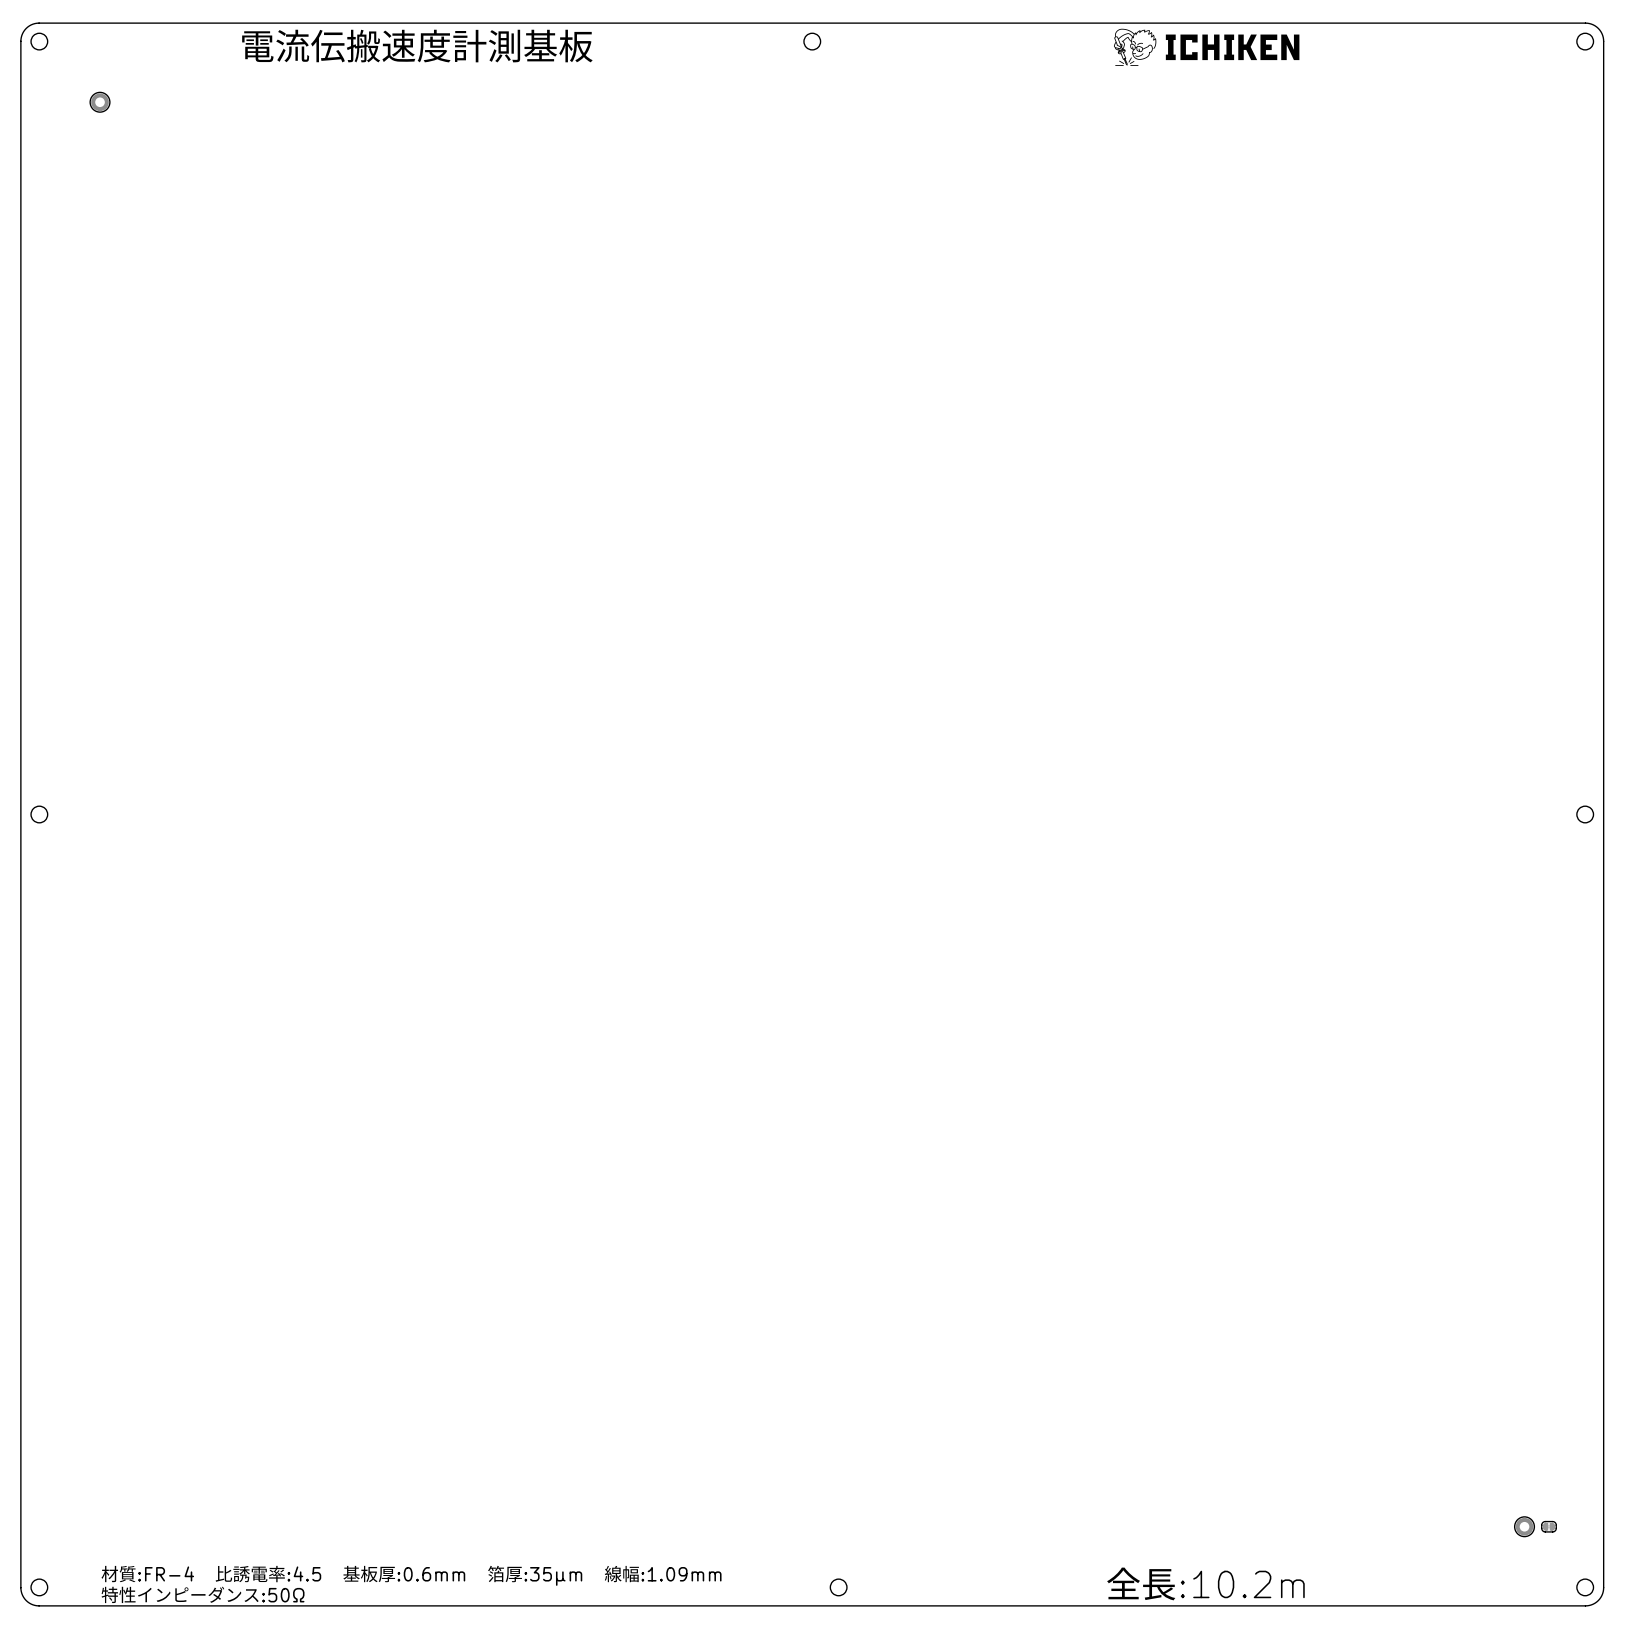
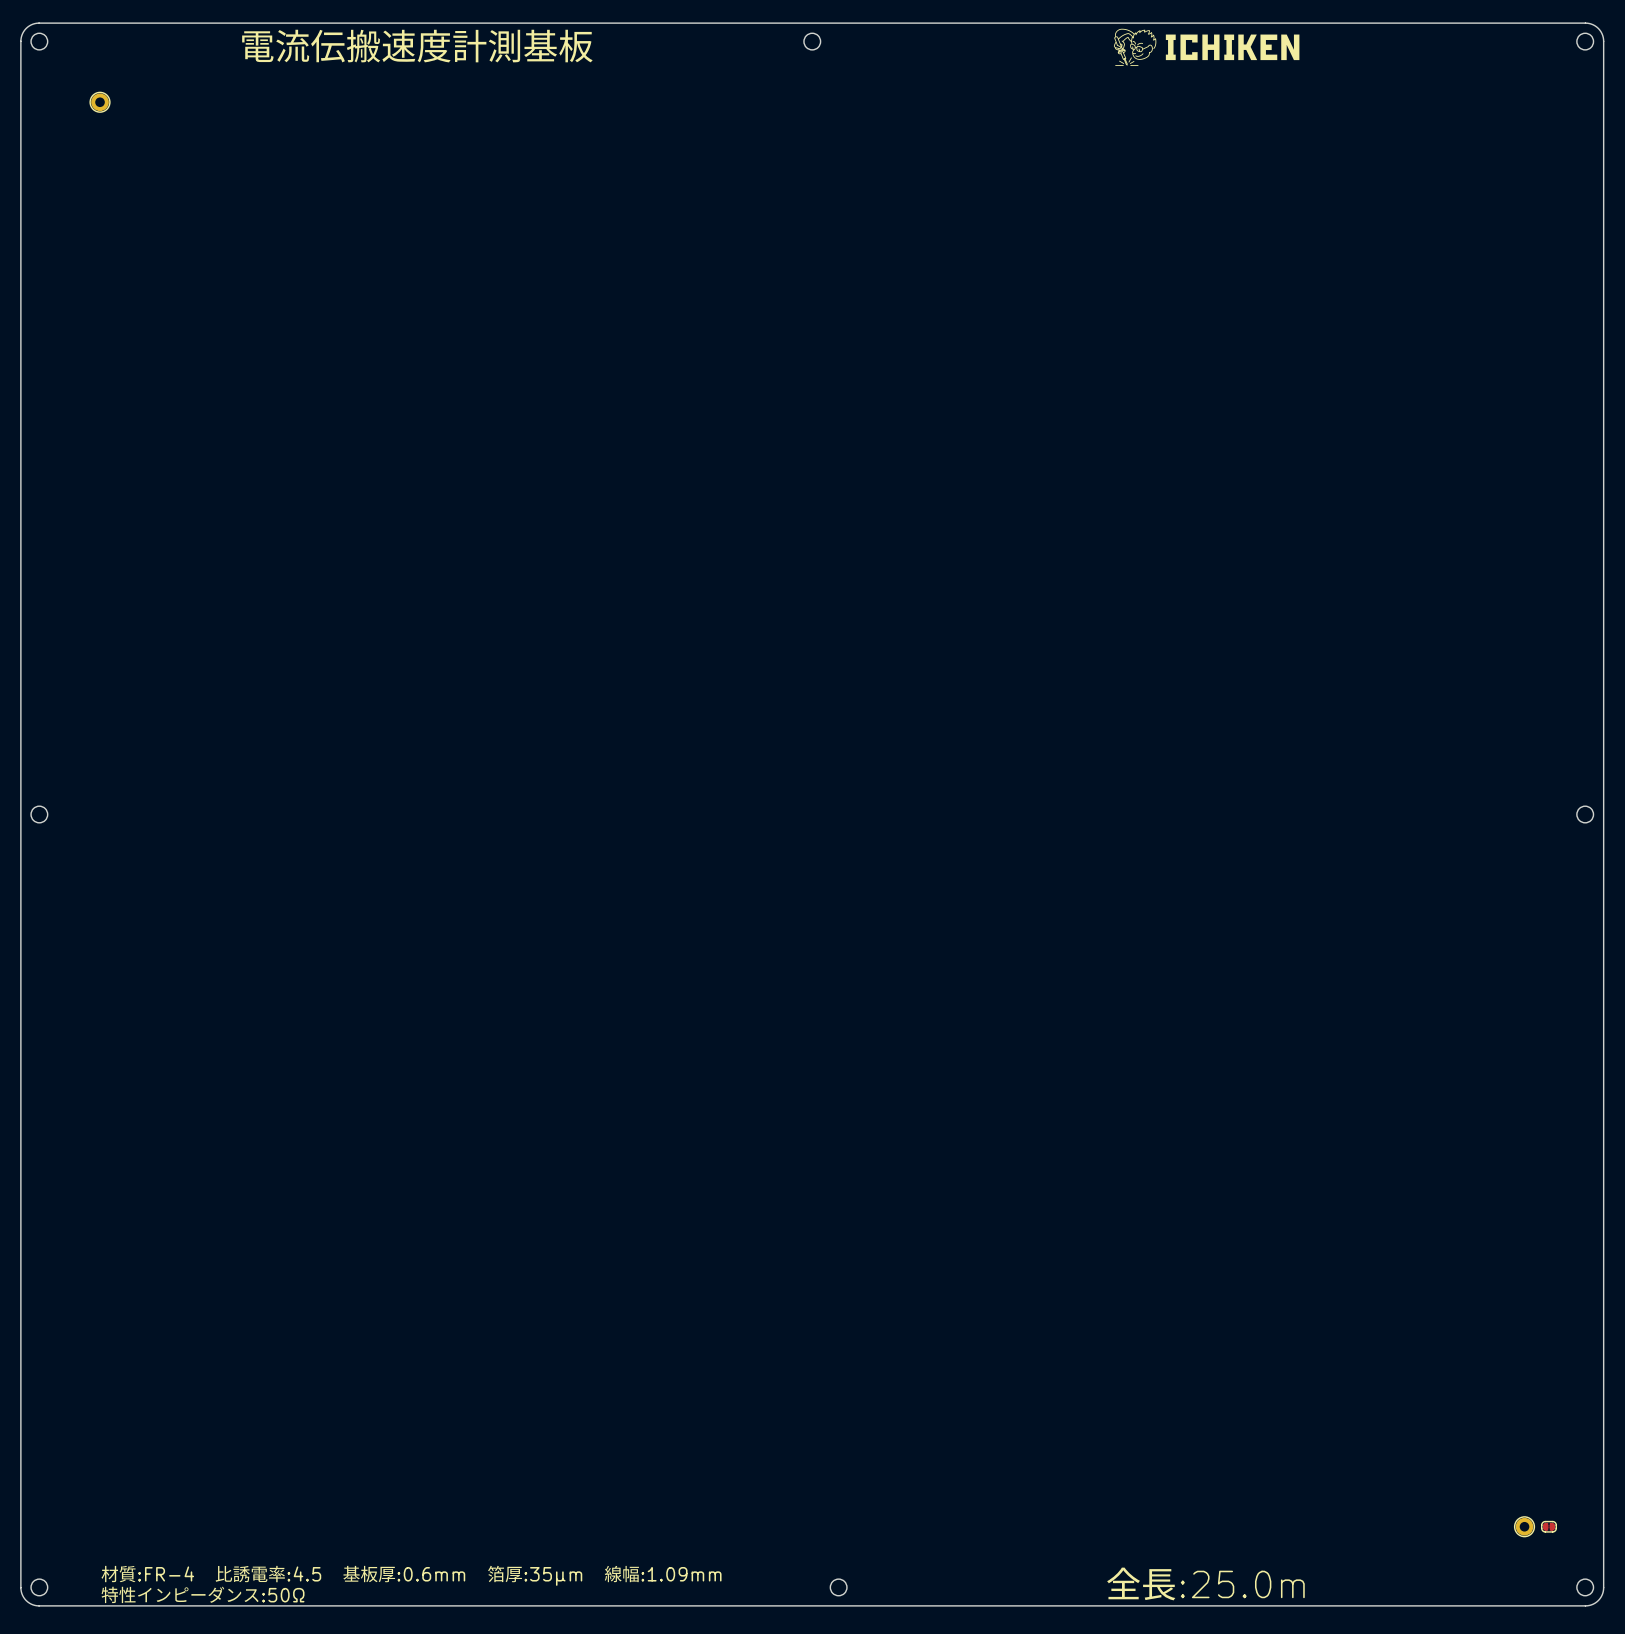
text: 全長:10.2m (1205, 1583) -> 全長:25.0m (1205, 1583)

